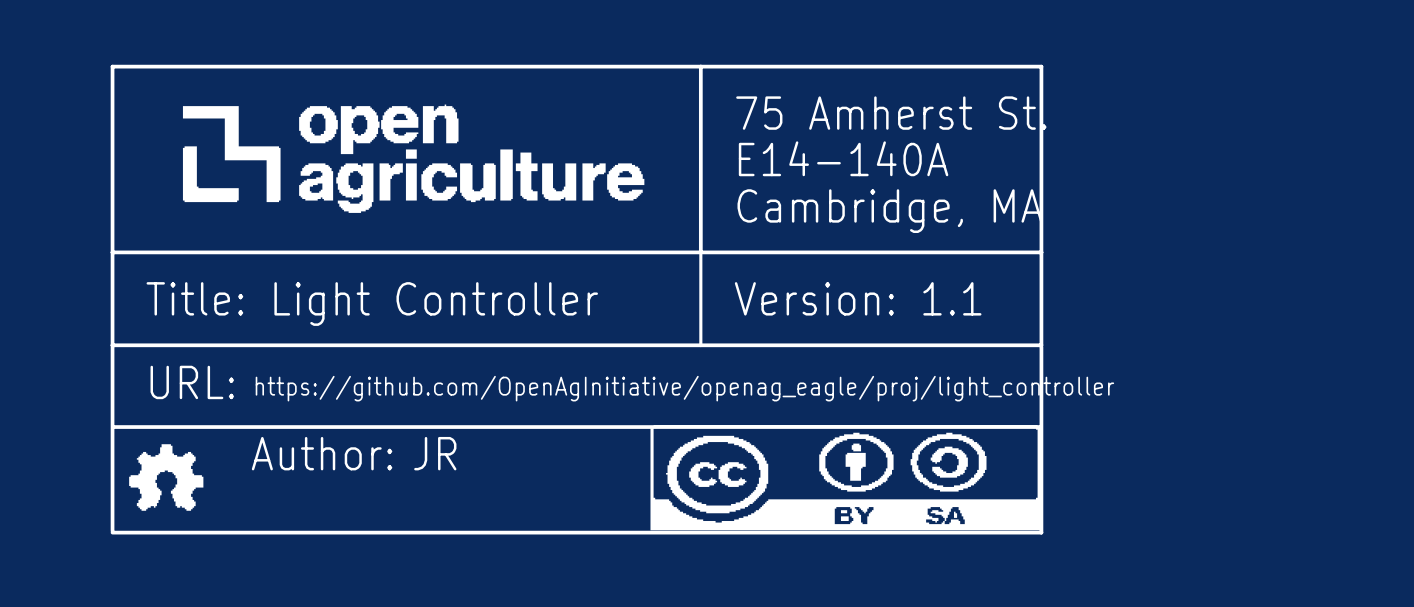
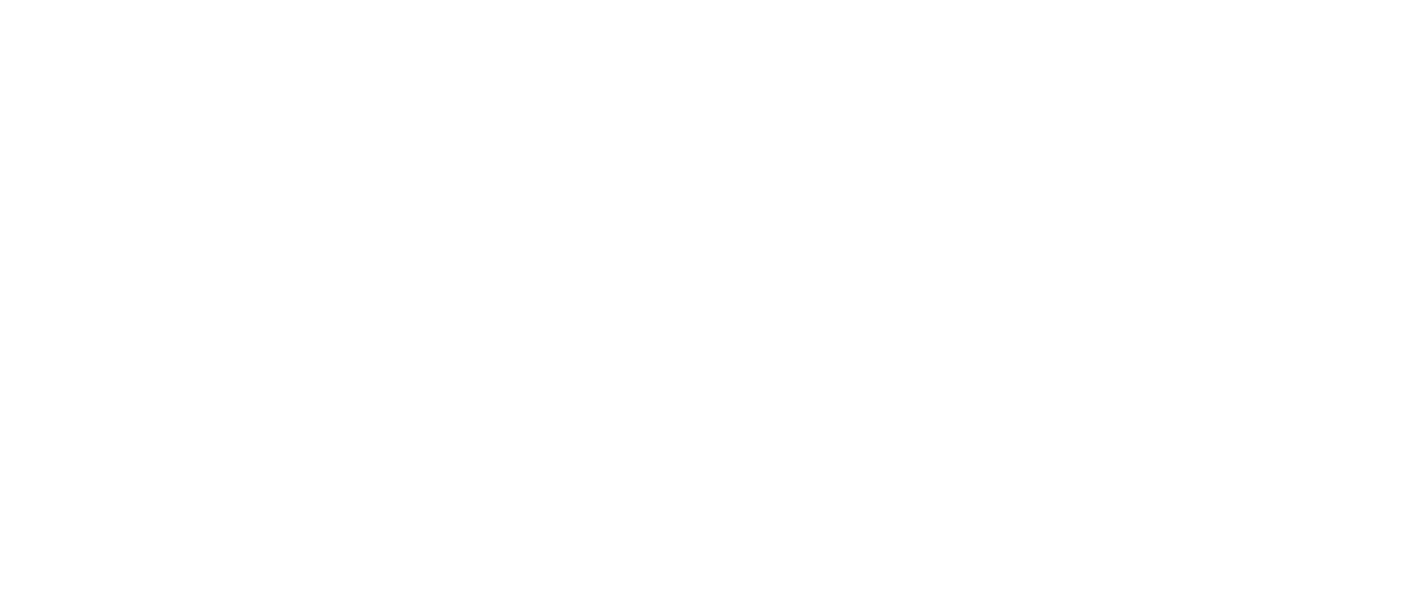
drawing: [110, 64, 1044, 535] -> none

